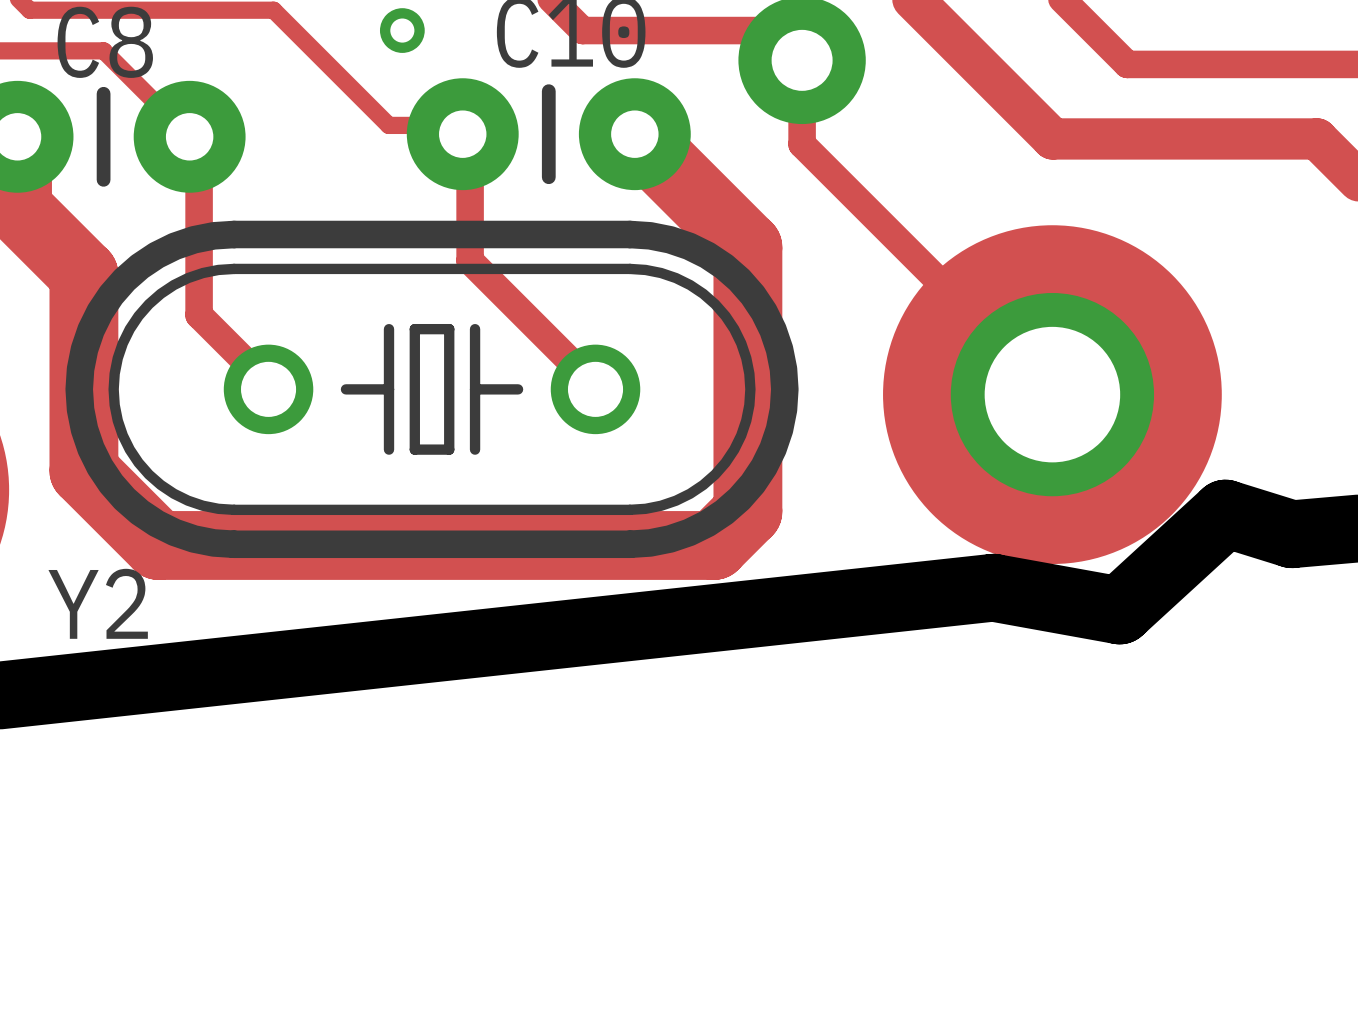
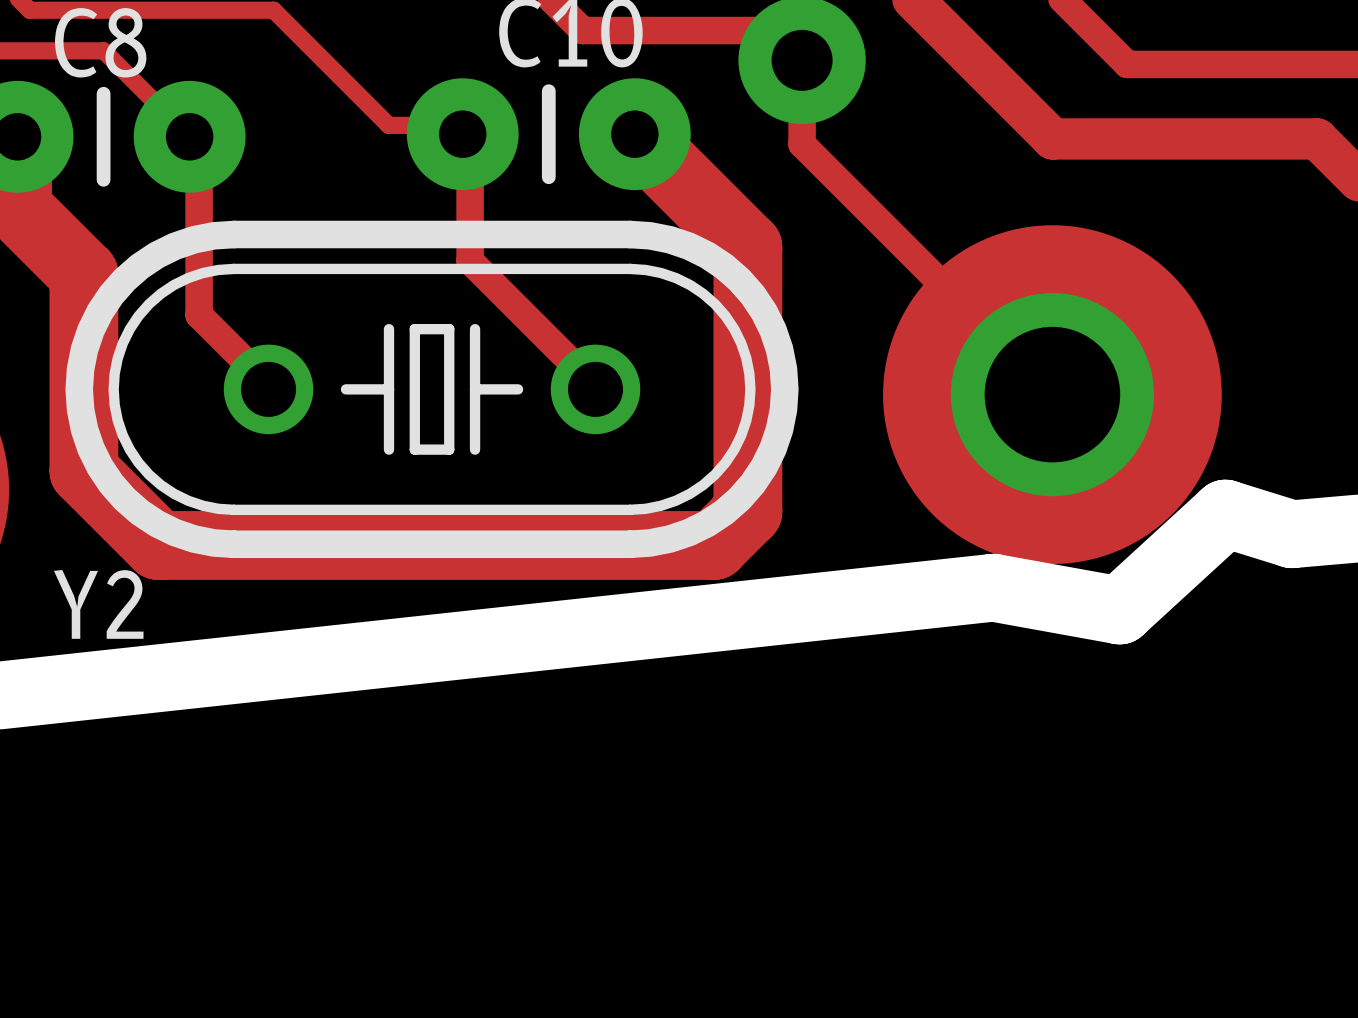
via: (402, 30) -> none

